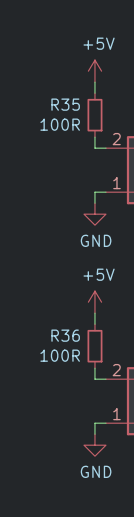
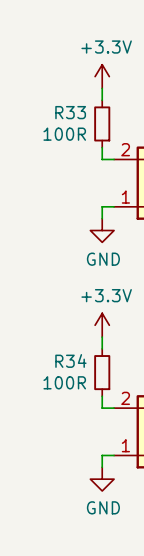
power symbol: +5V (94, 71) -> +3.3V (102, 76)
R35 name: R35 (65, 104) -> R33 (70, 112)
power symbol: +5V (94, 302) -> +3.3V (102, 325)
R36 name: R36 (65, 335) -> R34 (70, 360)

